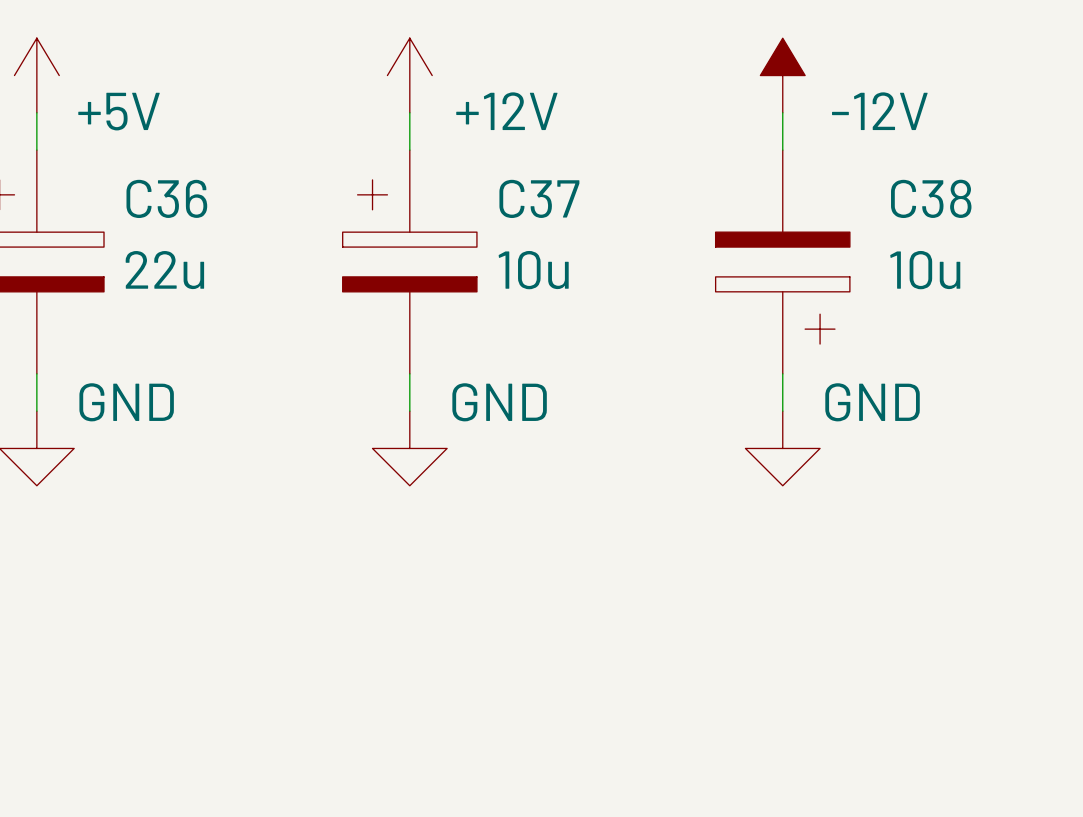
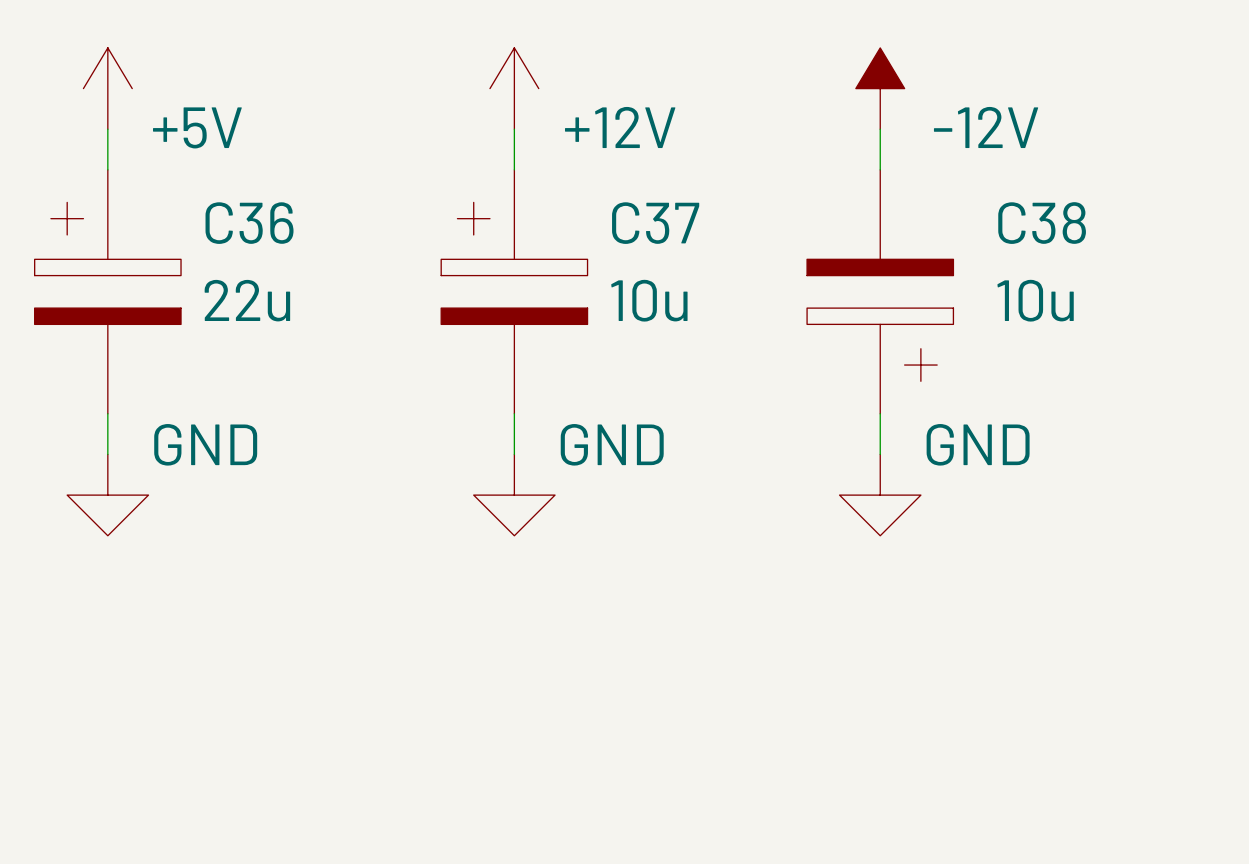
power symbol position: -12V (782, 75) -> -12V (880, 88)
wire: (782, 112) (782, 150) -> (880, 129) (880, 169)
C38 position: (782, 261) -> (880, 291)
wire: (782, 373) (782, 411) -> (880, 413) (880, 454)
power symbol position: GND (782, 448) -> GND (880, 495)

